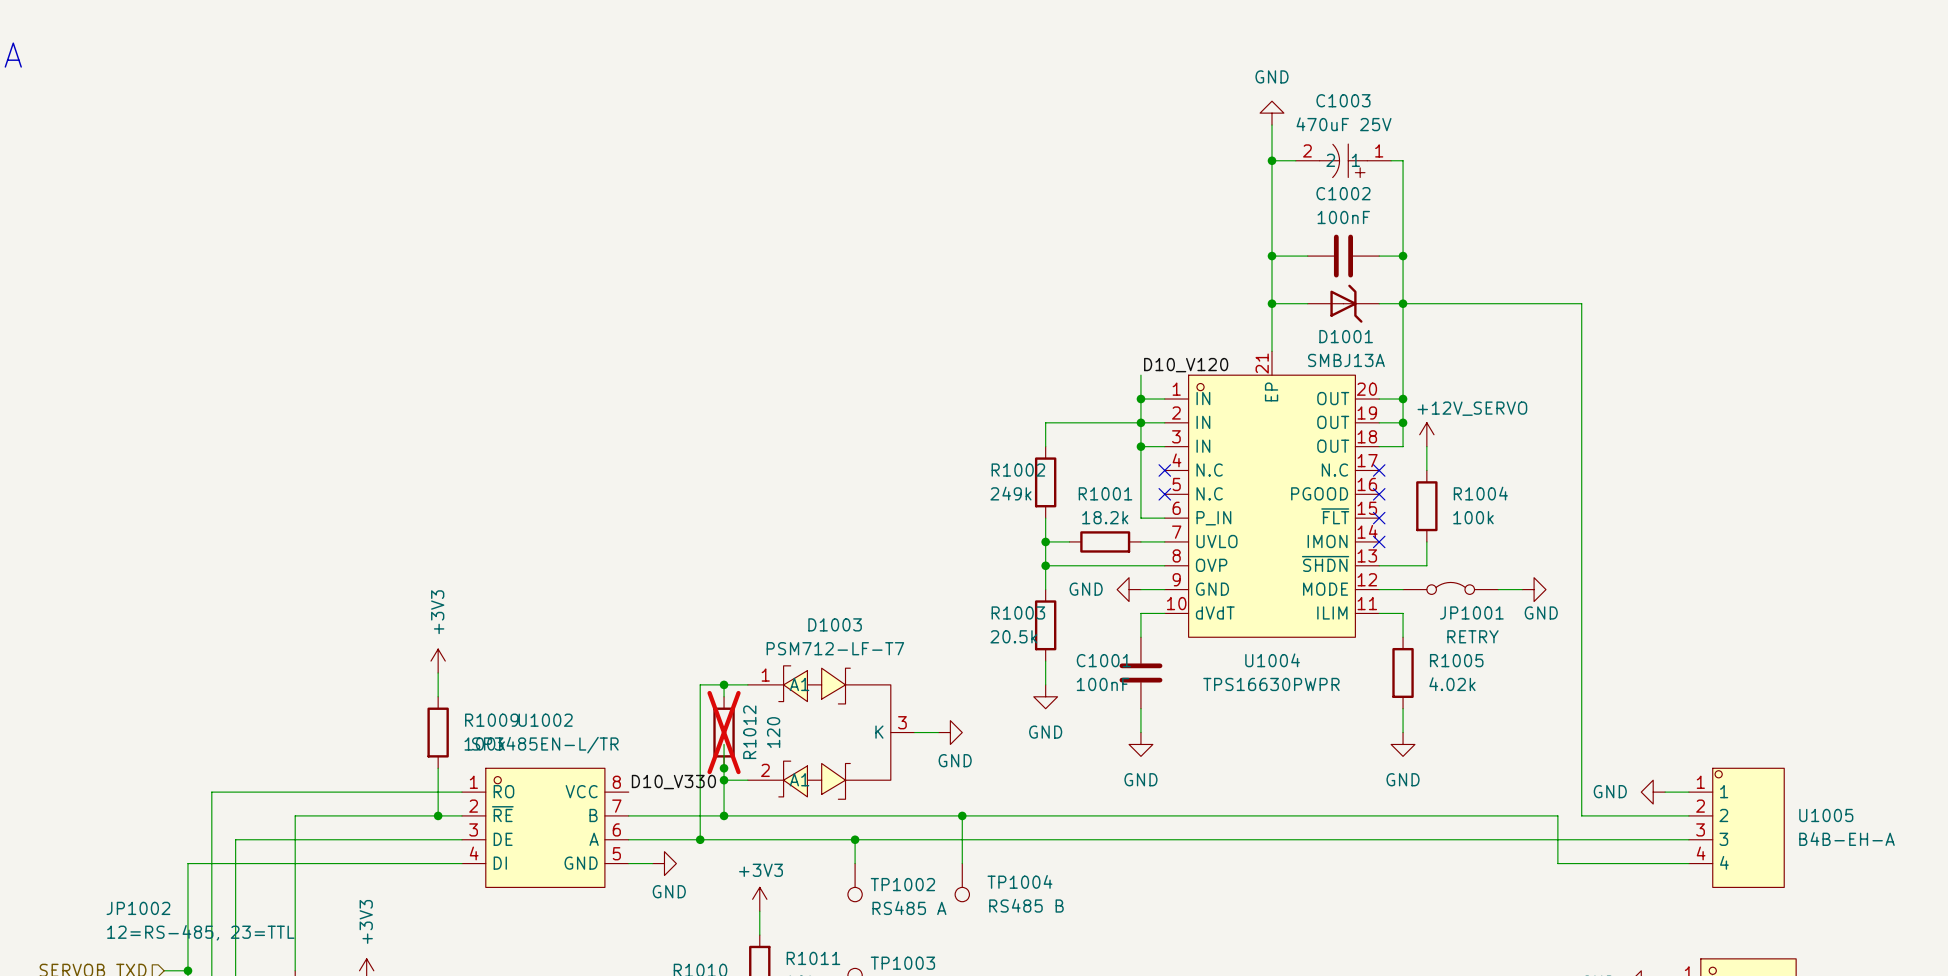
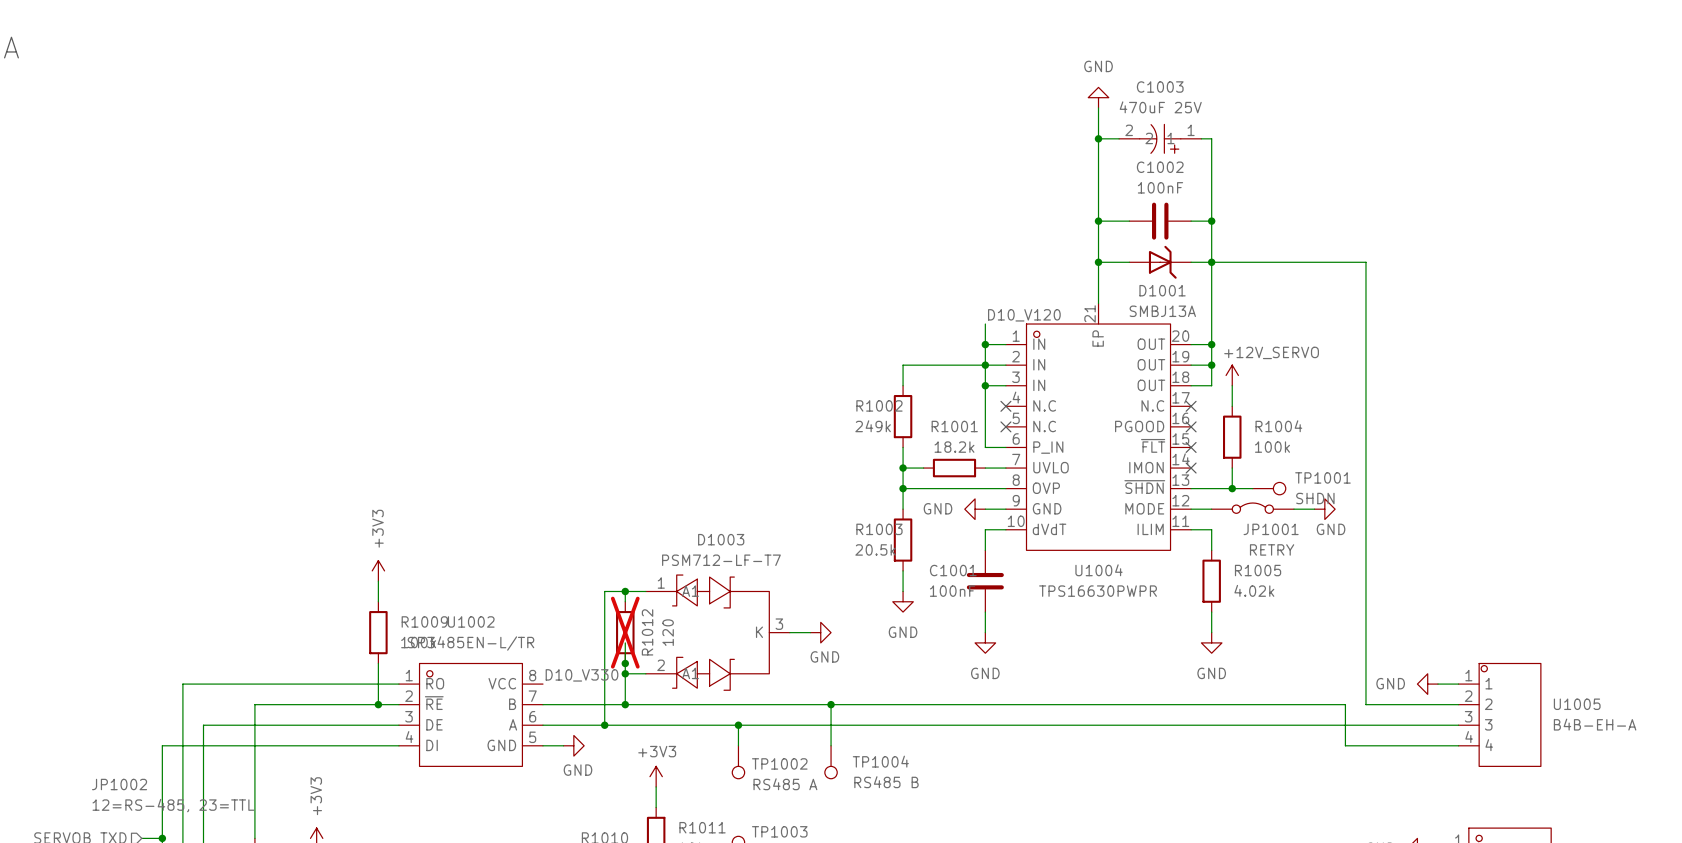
wire: none -> (1232, 488) (1252, 488)
junction: none -> (1232, 488)
TP1001: none -> SHDN (1269, 488)

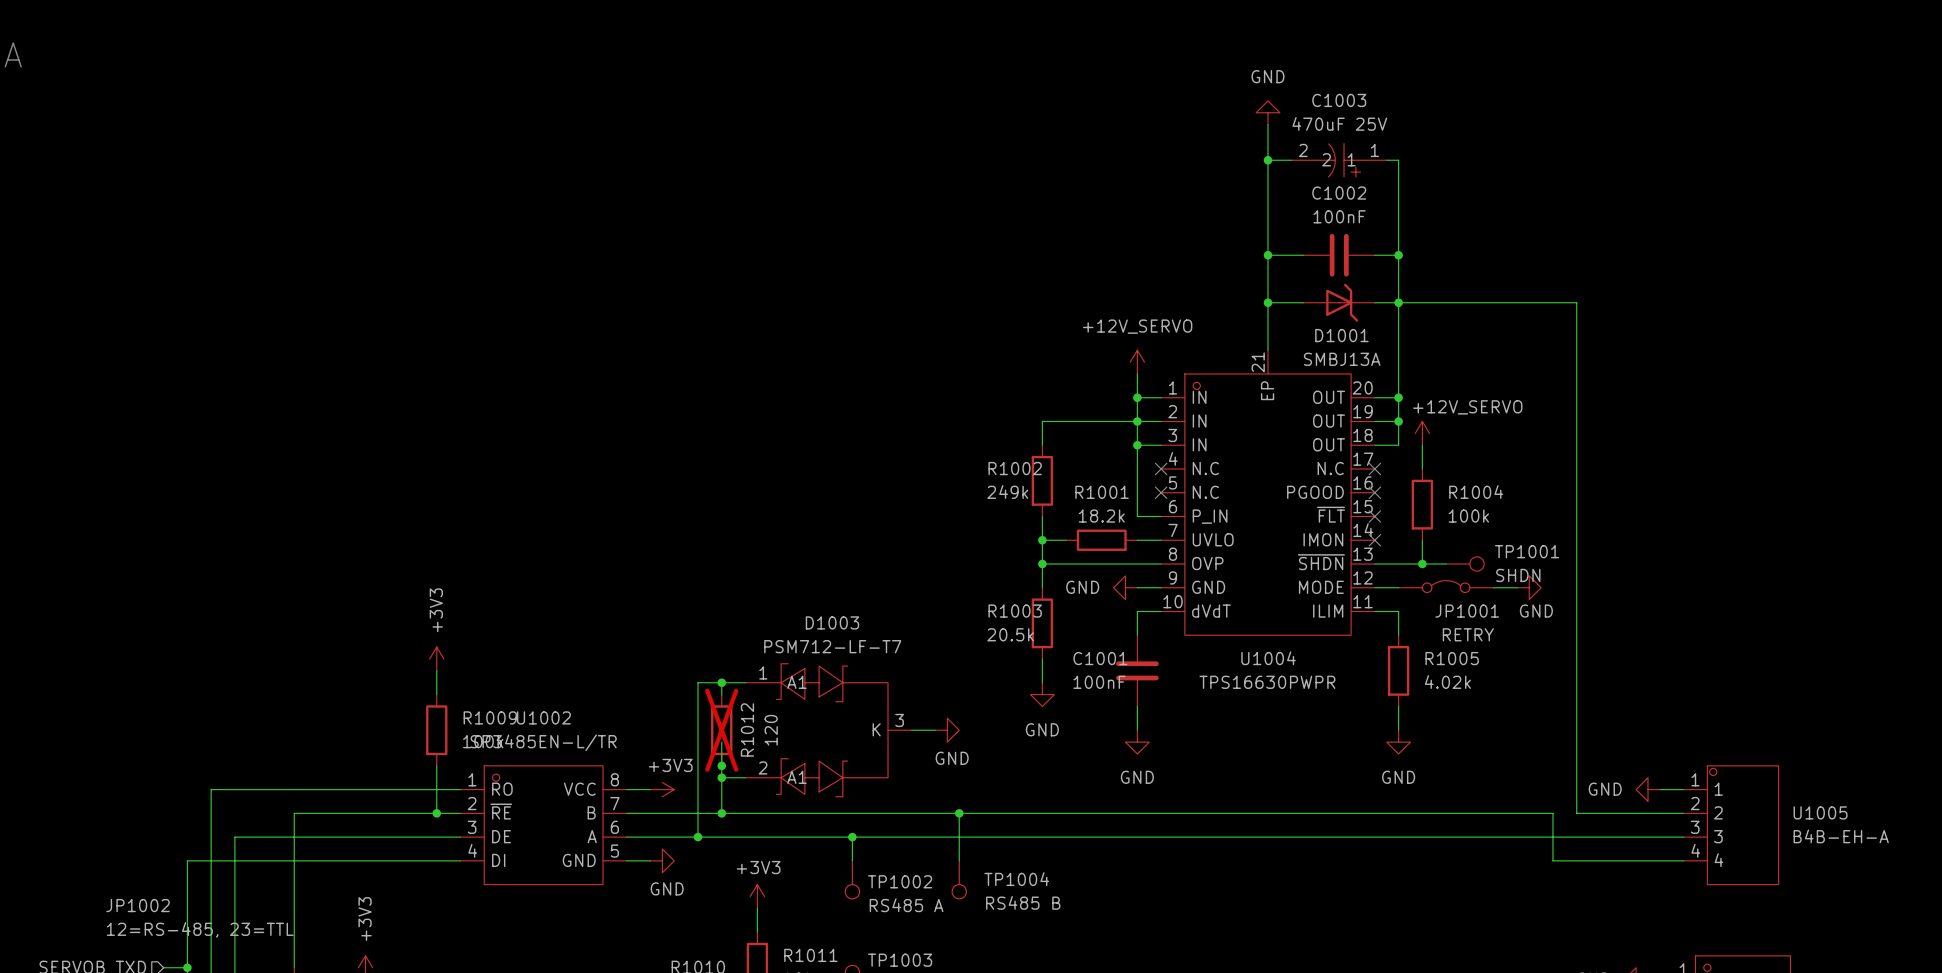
power symbol: none -> +12V_SERVO (1137, 362)
label: D10_V120 (1024, 315) -> none
label: D10_V330 (582, 675) -> none
wire: none -> (626, 789) (650, 789)
power symbol: none -> +3V3 (662, 789)

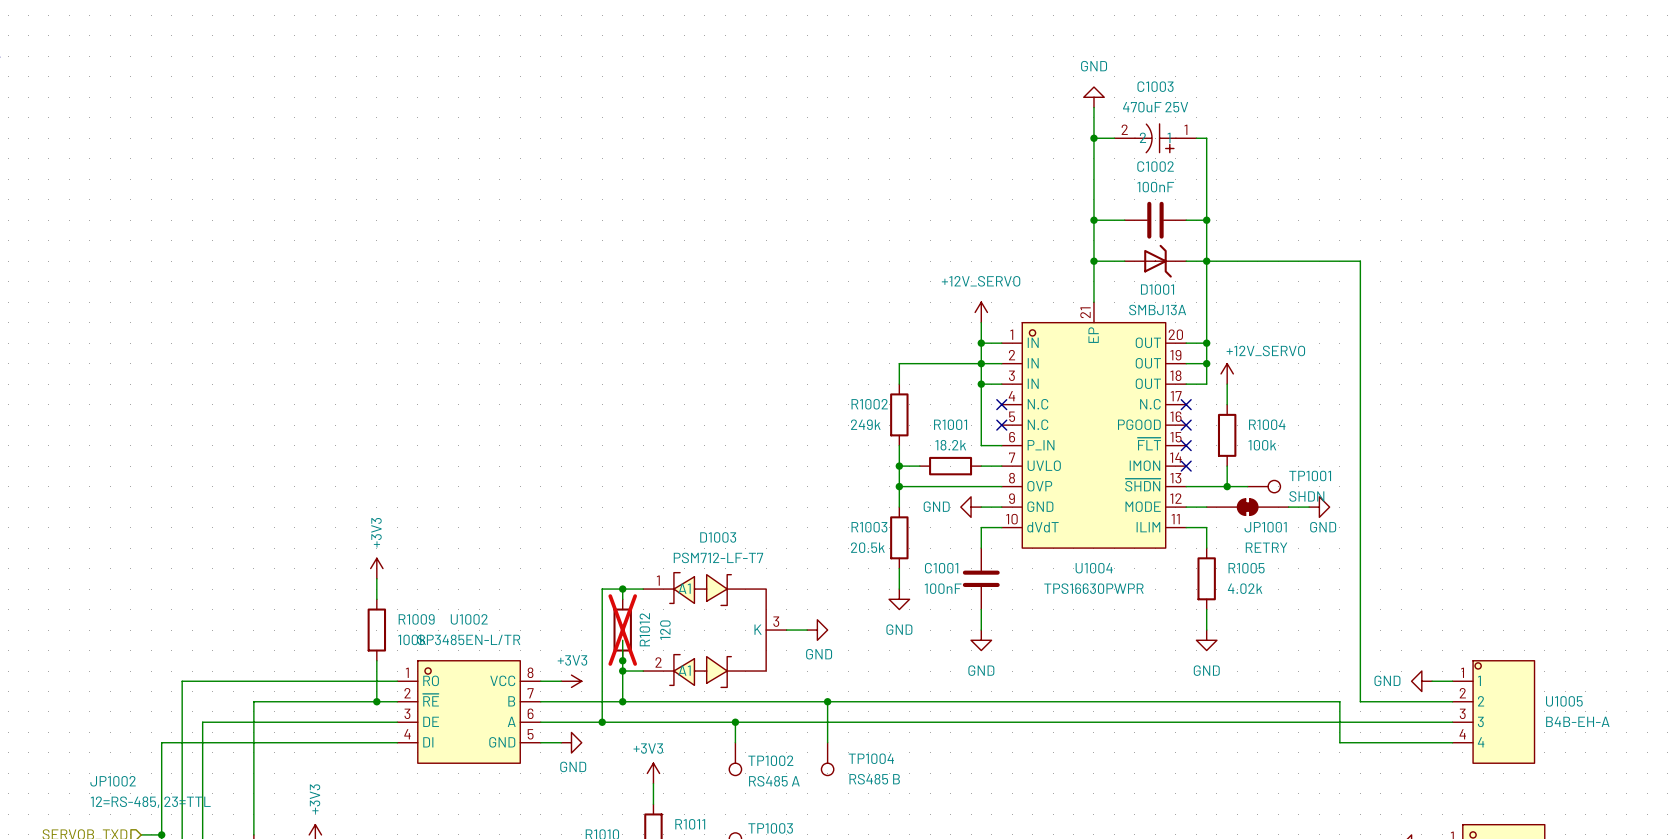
JP1001 symbol: [1398, 580, 1494, 593] -> [1206, 498, 1289, 516]

